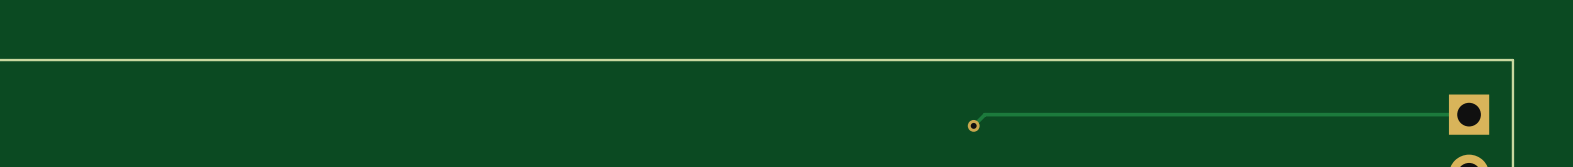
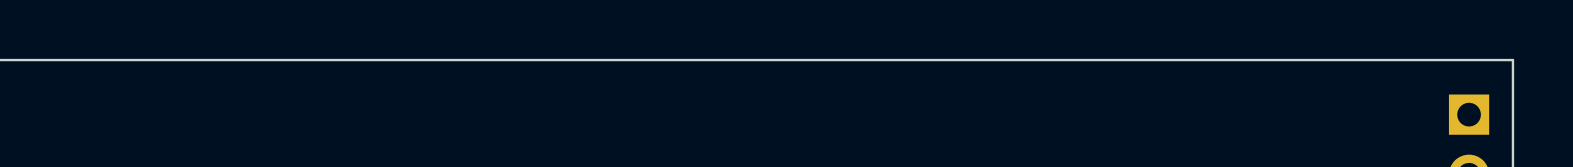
track: (1469, 114) (984, 114) (973, 125) -> none
via: (973, 125) -> none

